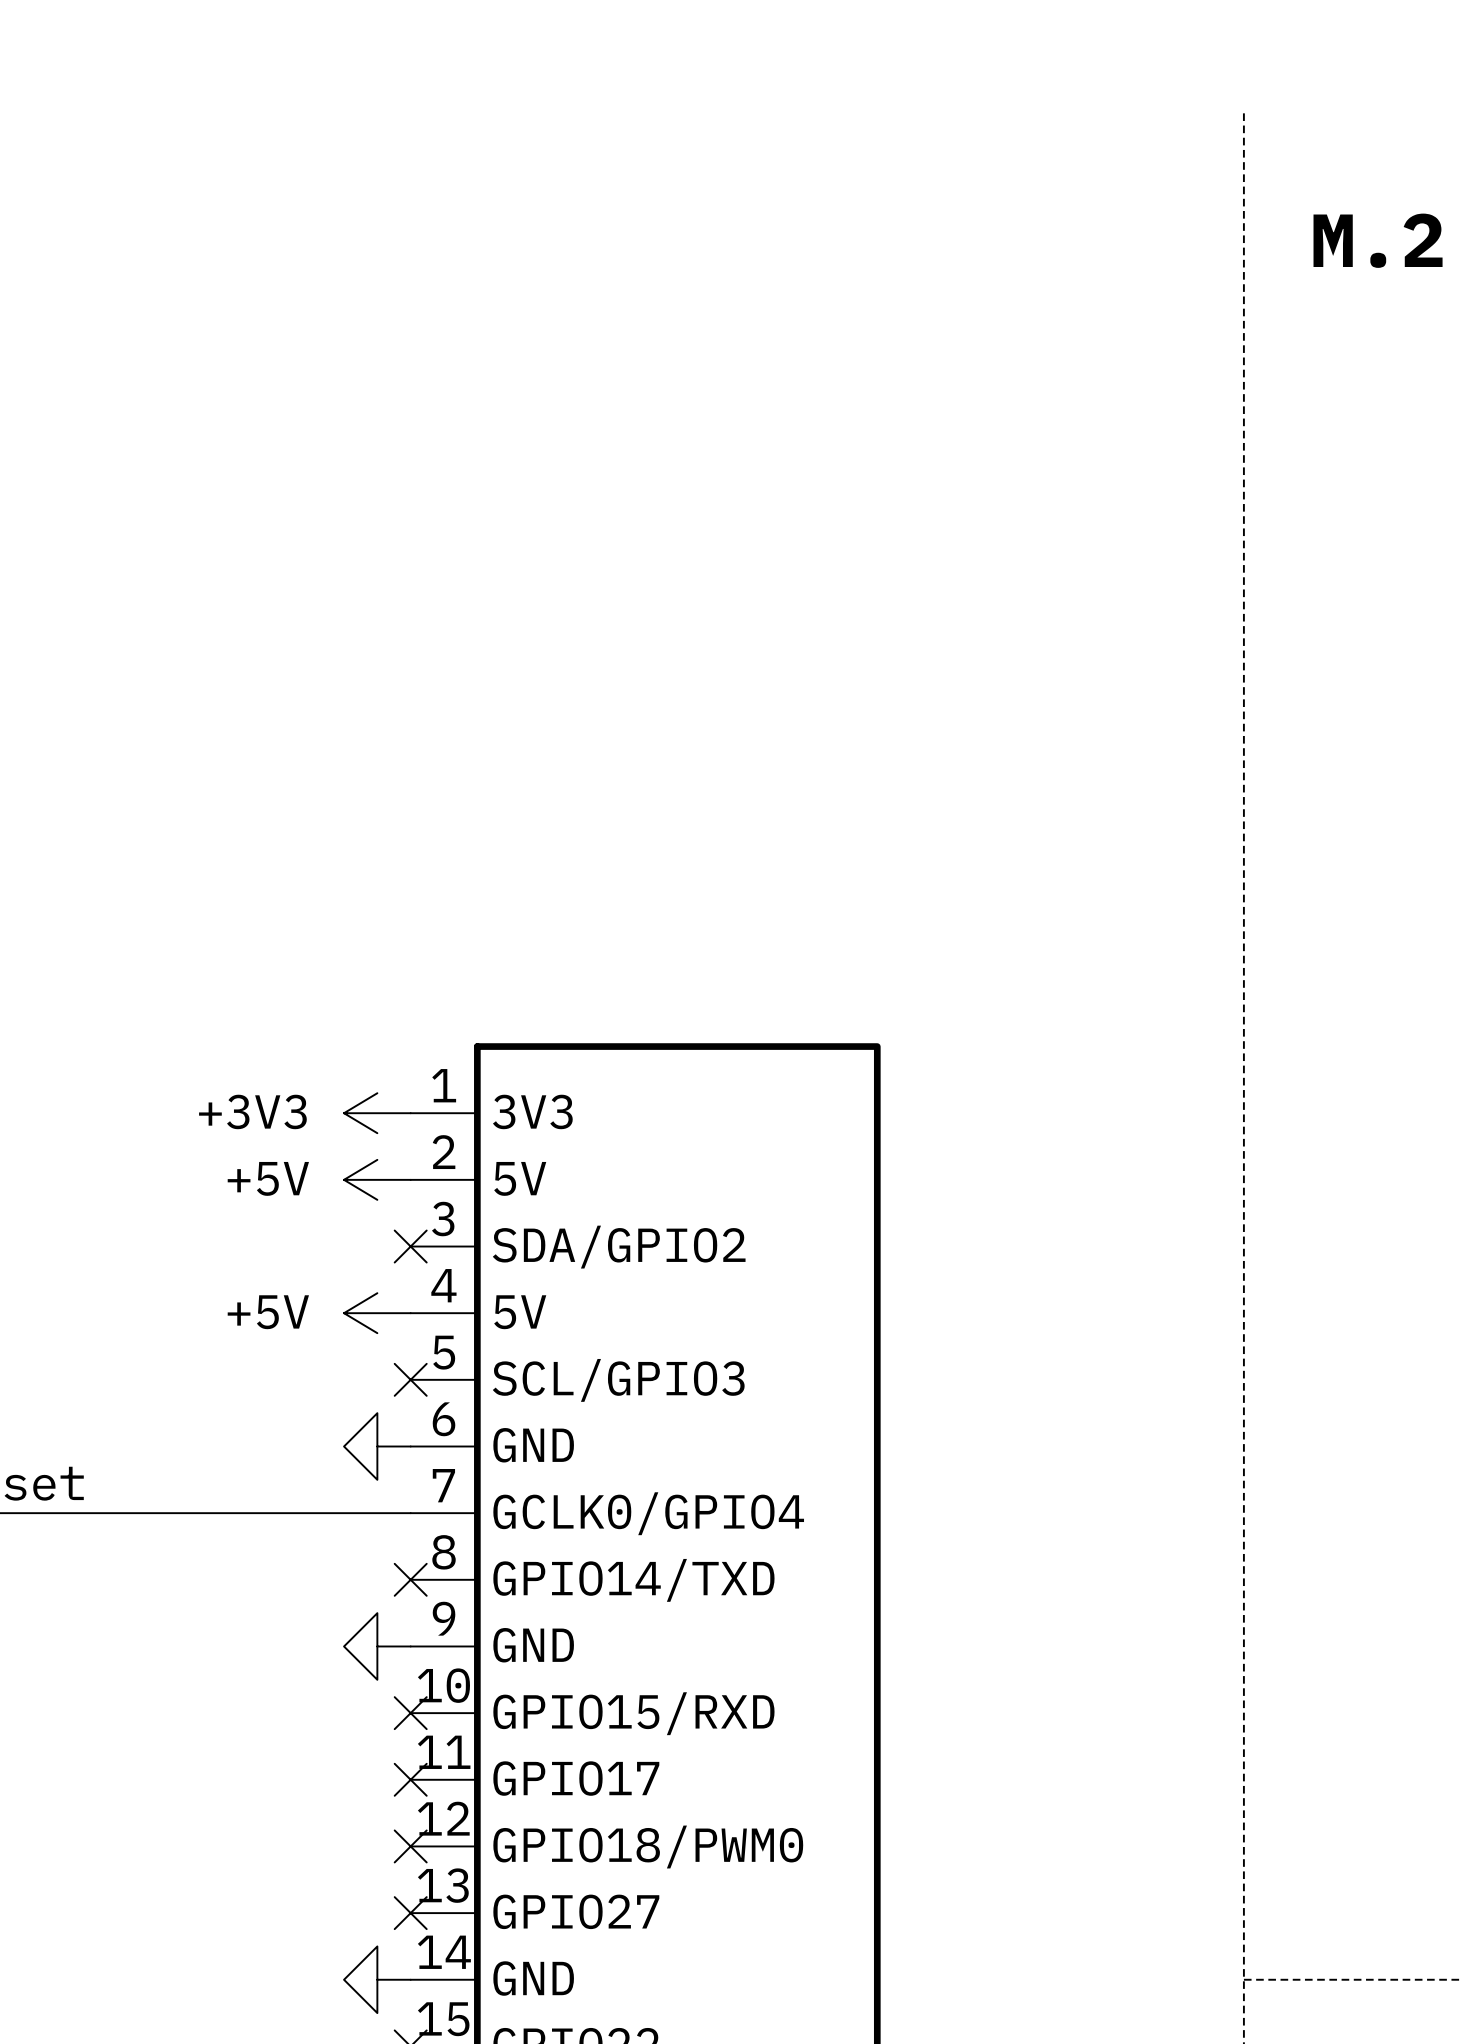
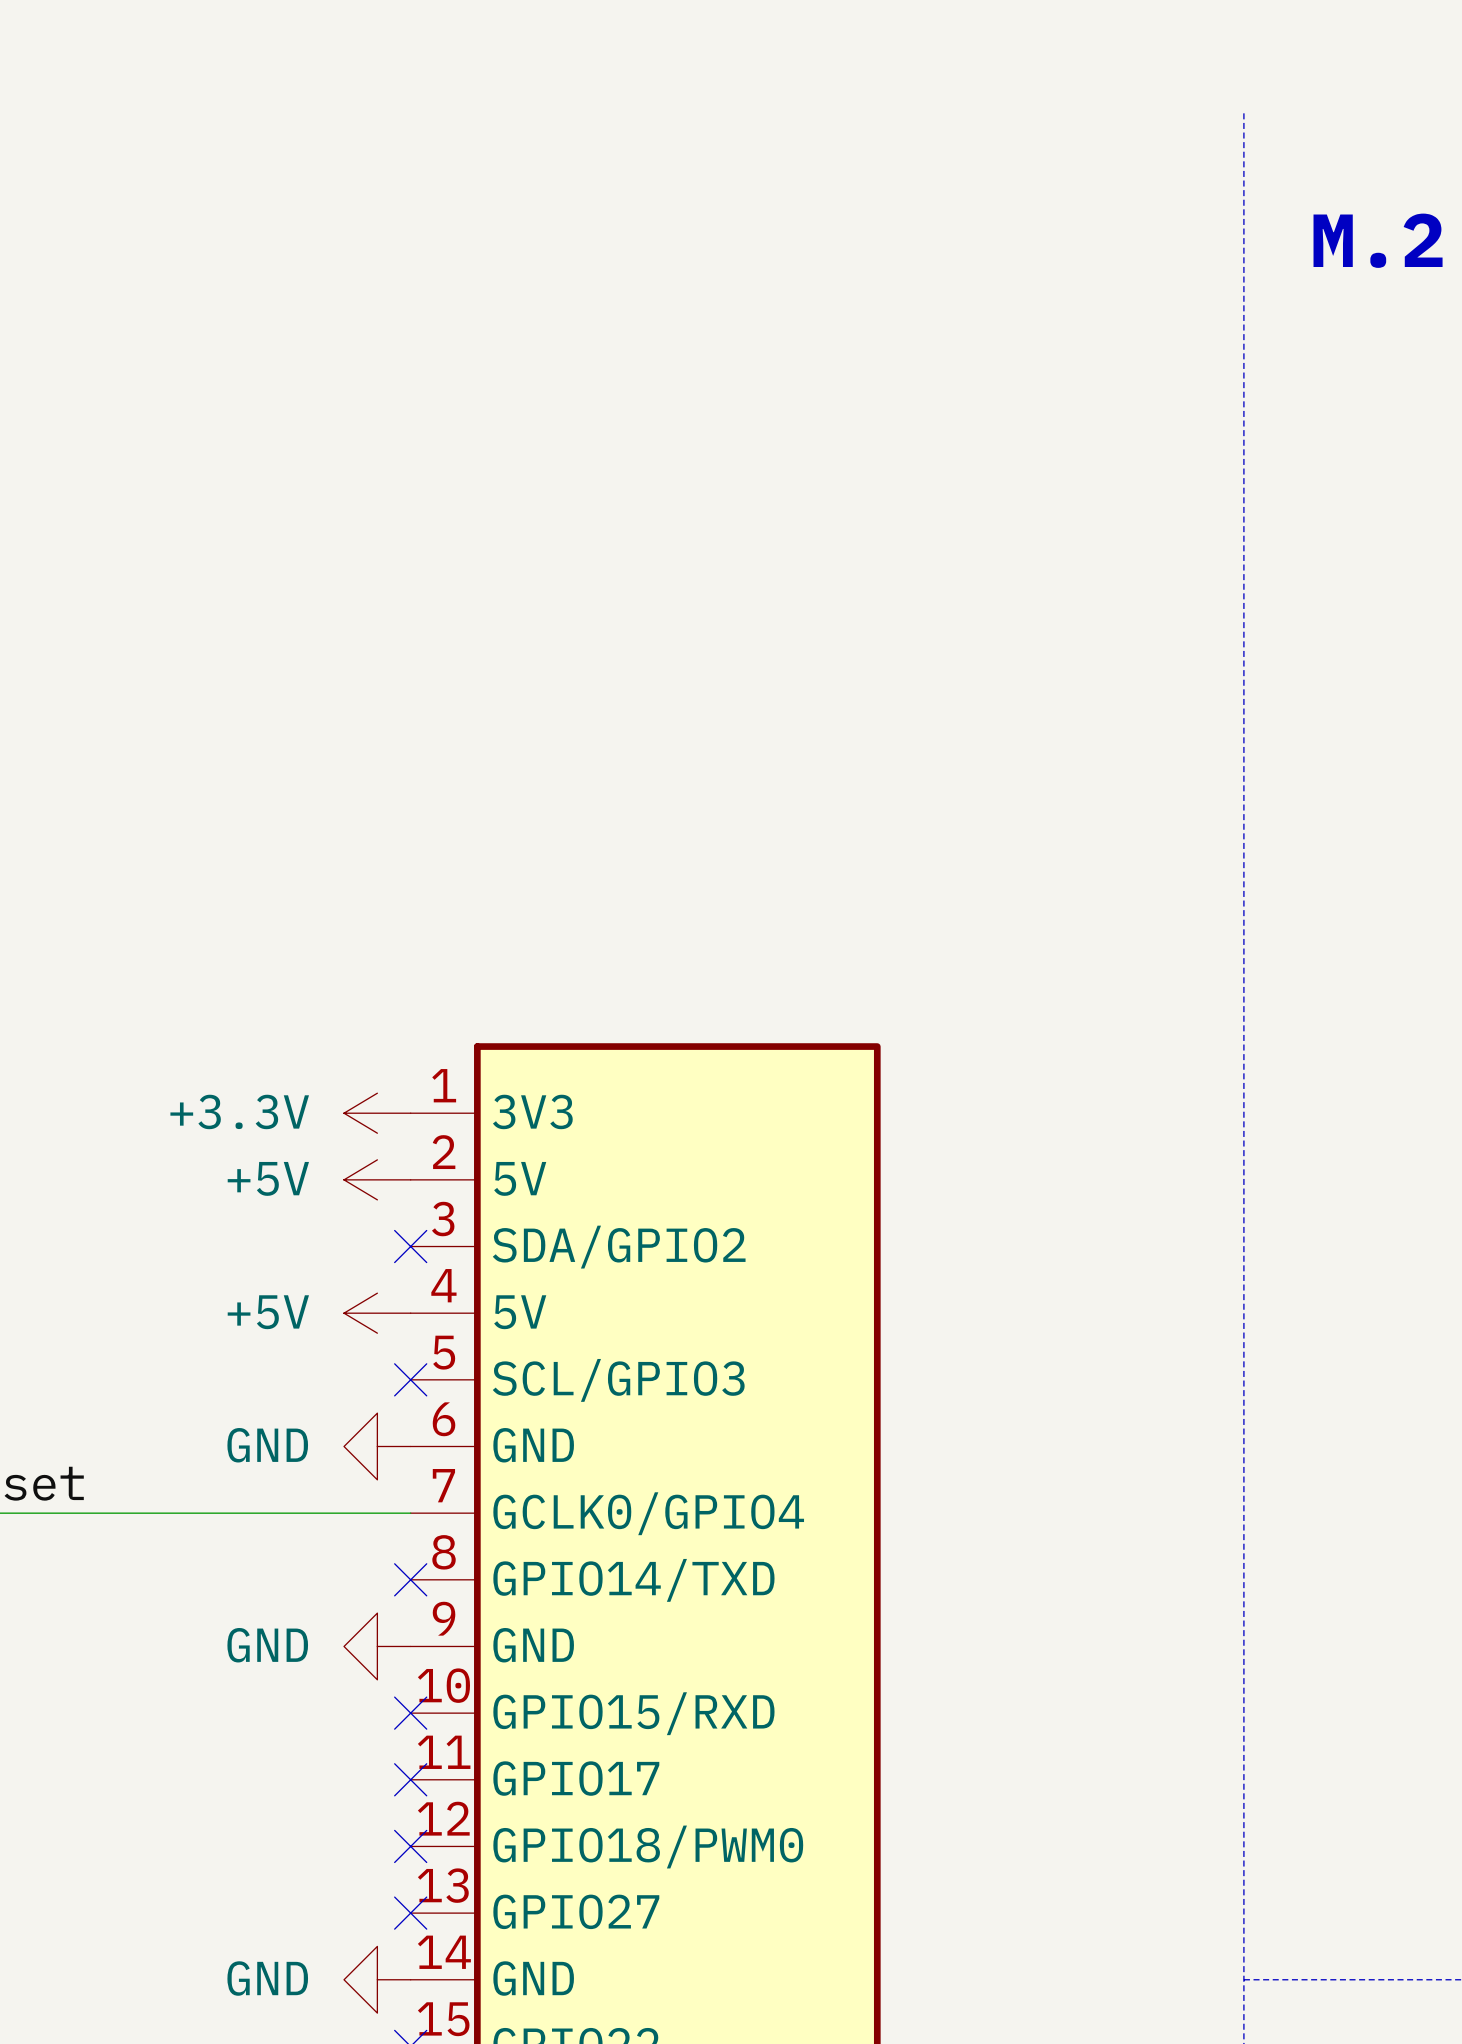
power symbol: +3V3 (377, 1113) -> +3.3V (377, 1113)
power symbol text: none -> GND (267, 1445)
power symbol text: none -> GND (267, 1645)
power symbol text: none -> GND (267, 1978)

